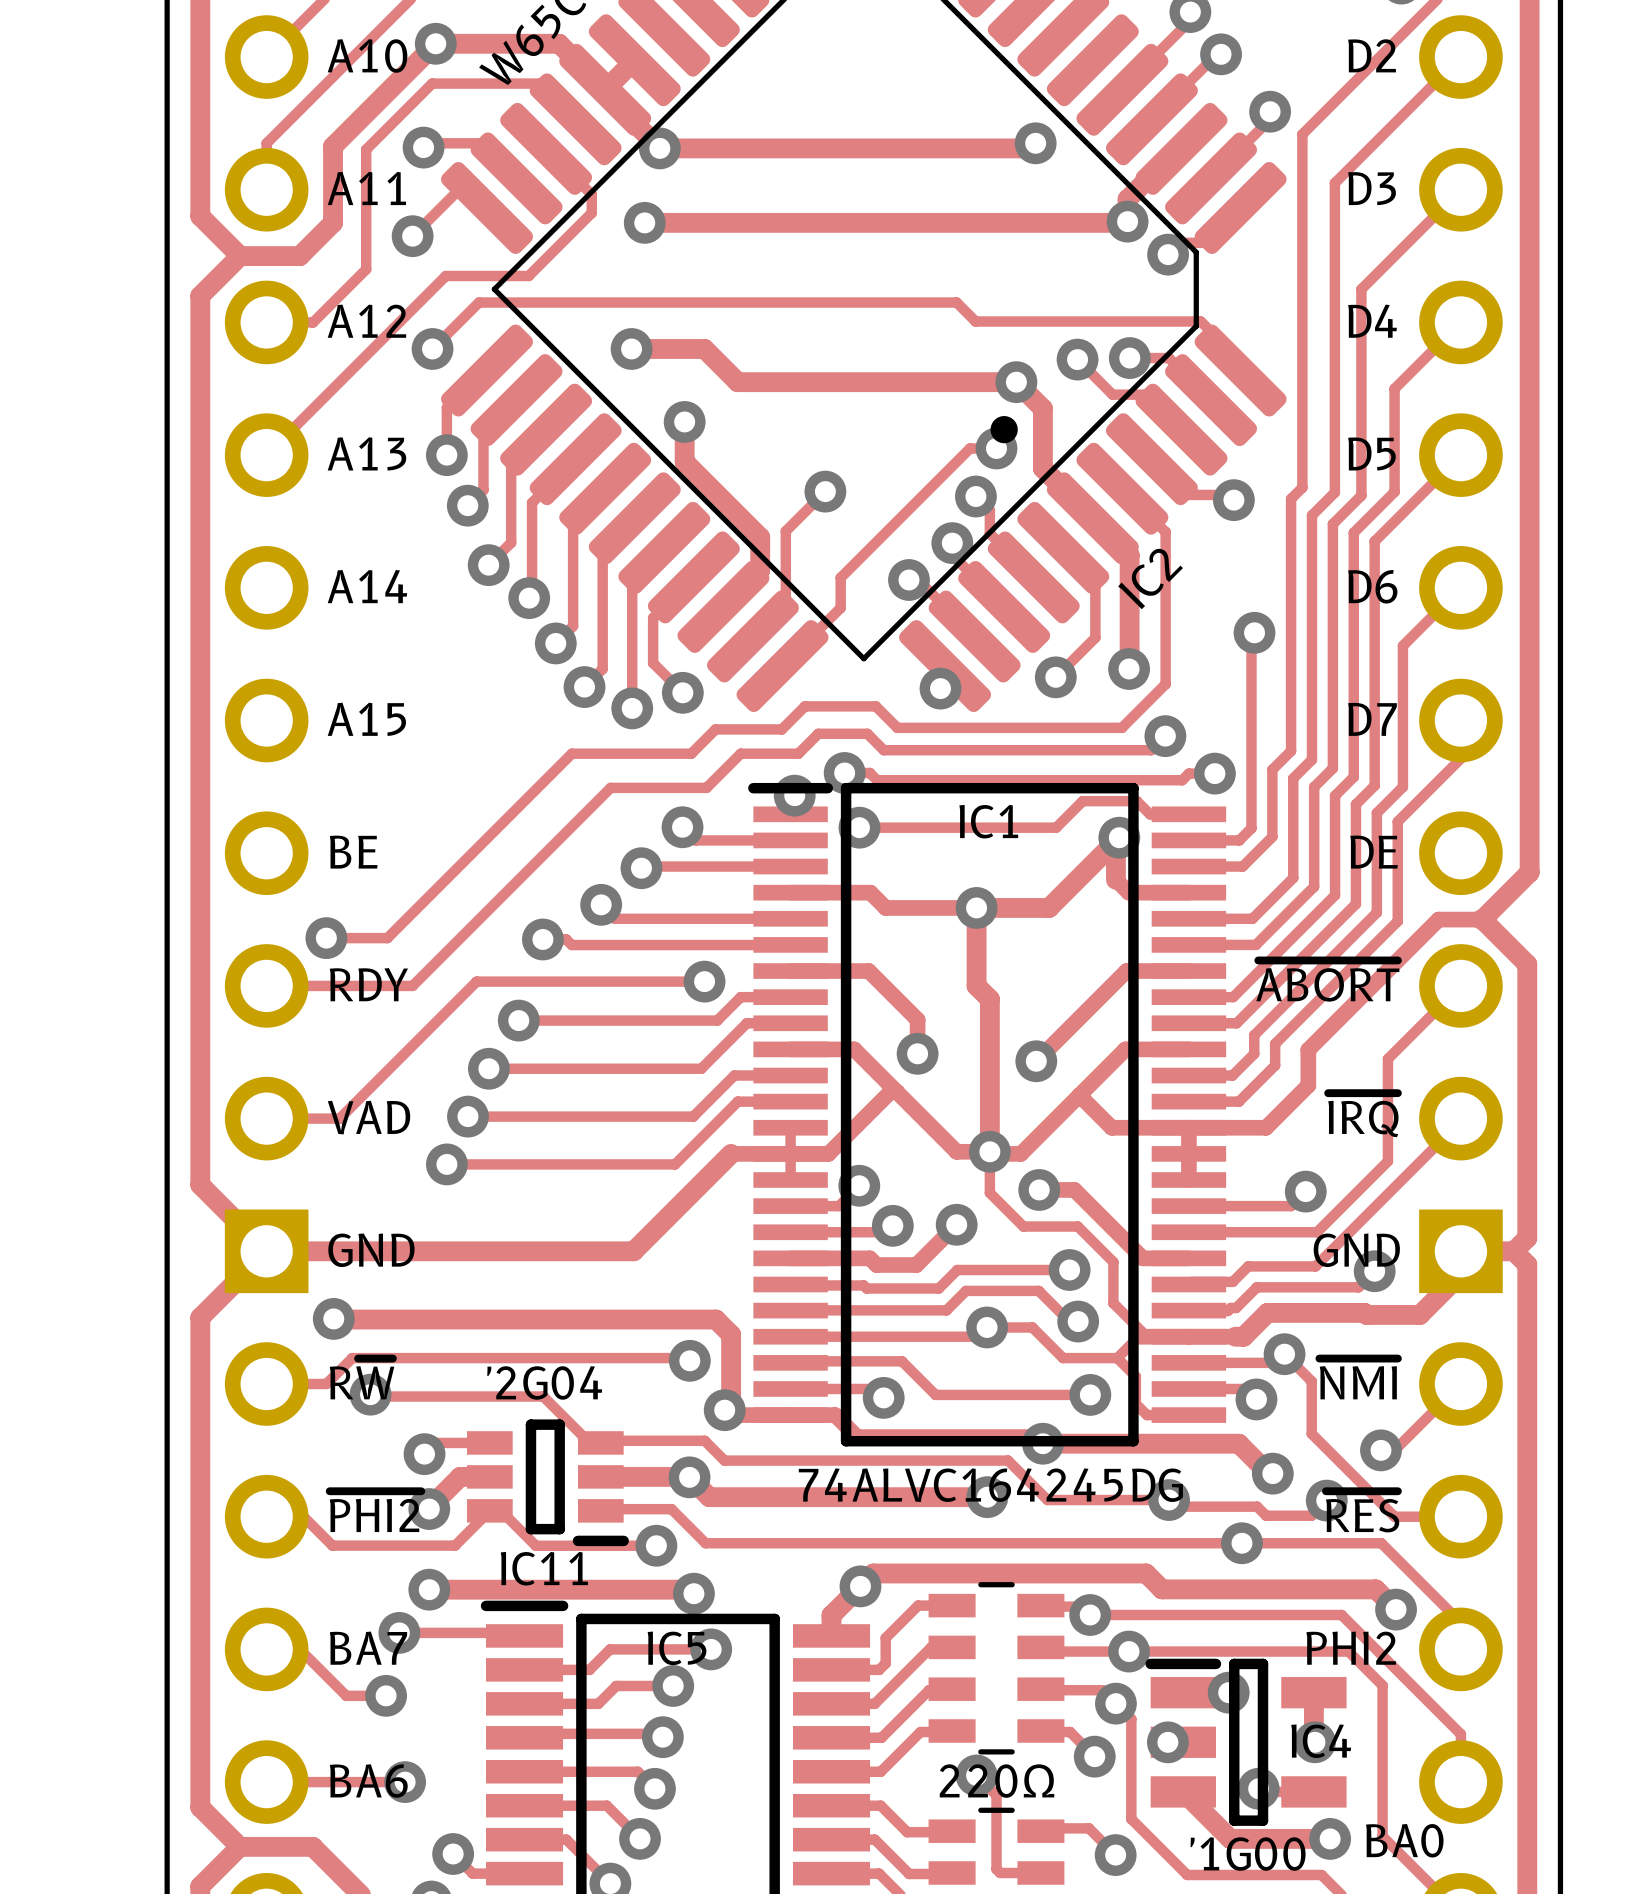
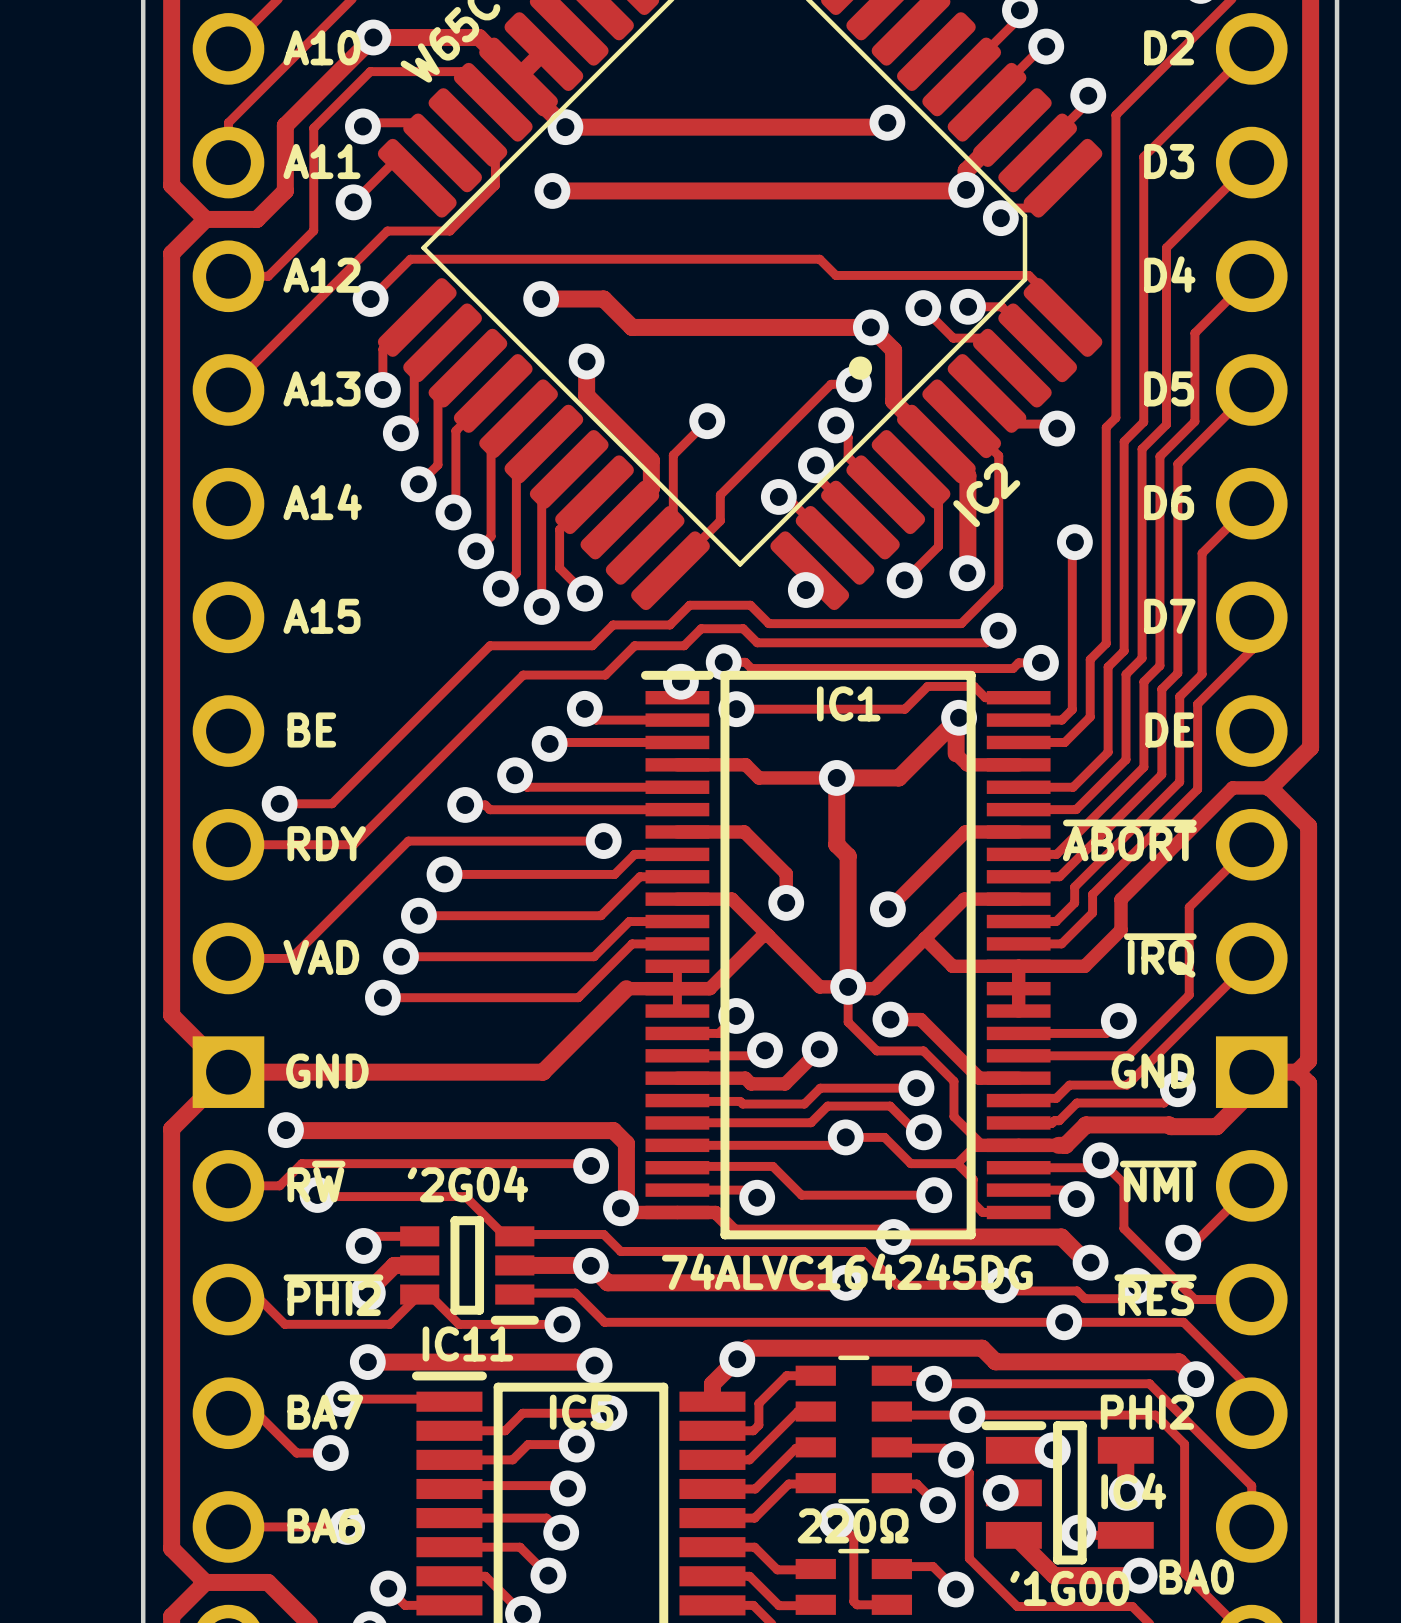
track: (546, 148) (591, 194) (591, 212) (528, 276) (445, 276) -> (495, 155) (495, 185) (449, 231) (387, 231) (381, 236)

